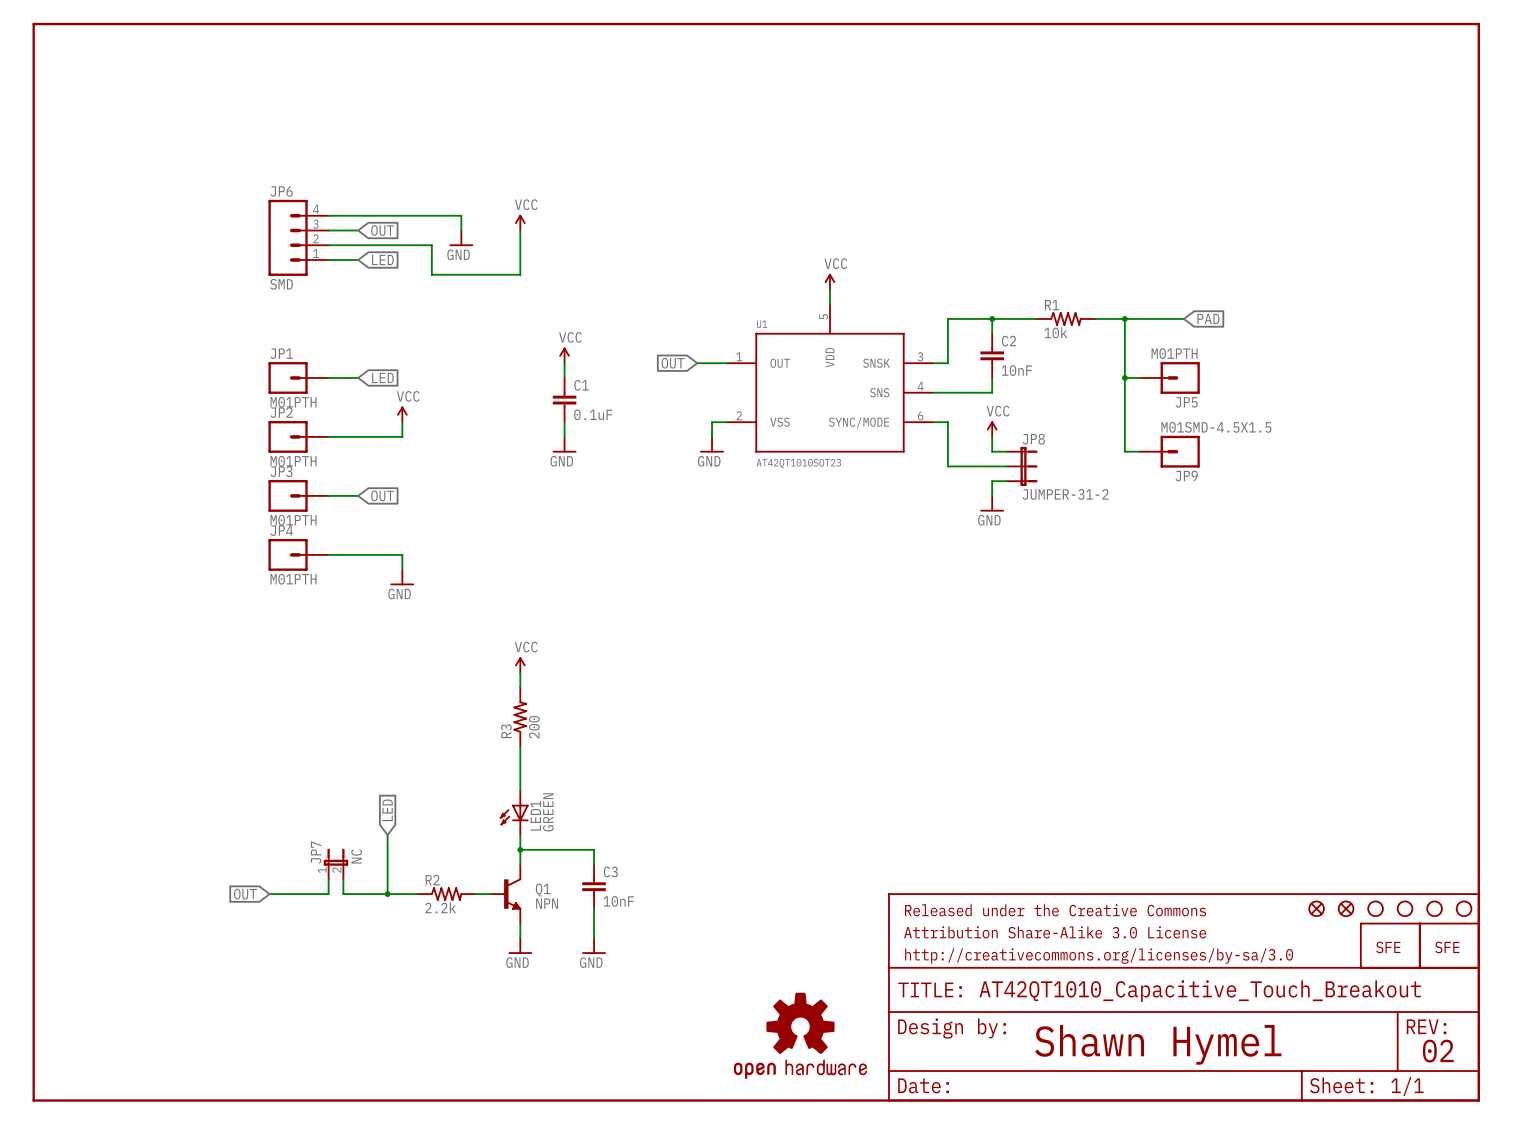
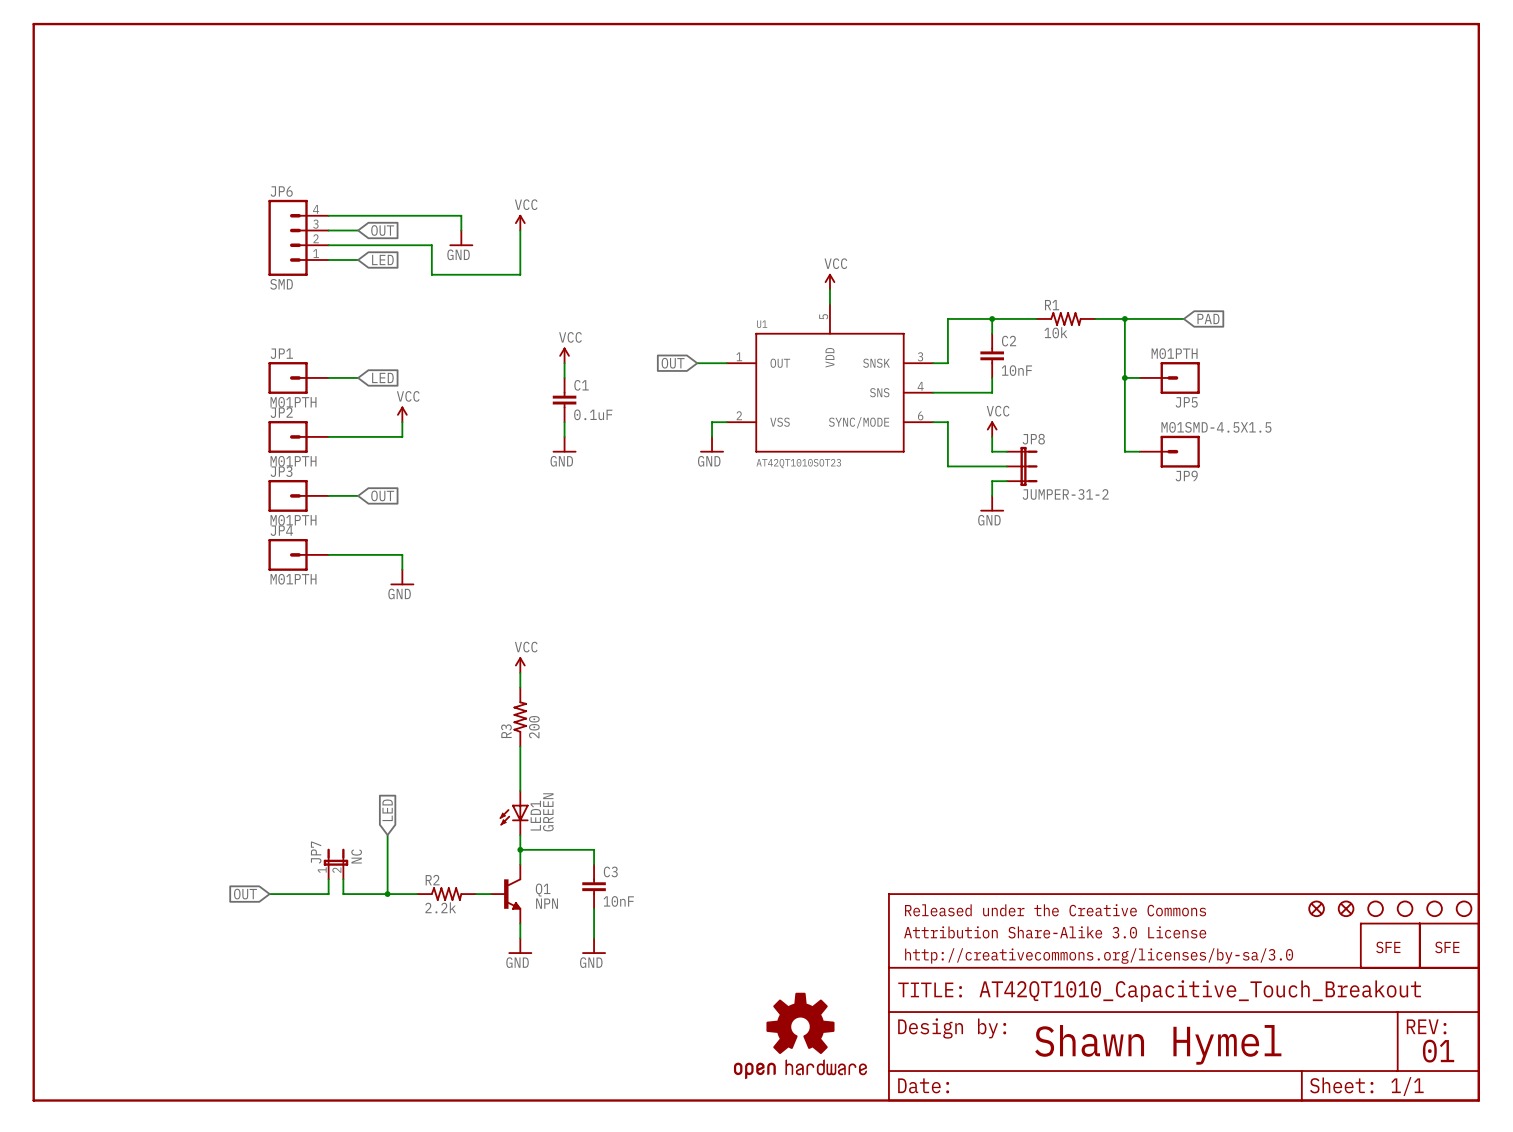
text: 02 (1438, 1051) -> 01 (1438, 1051)

